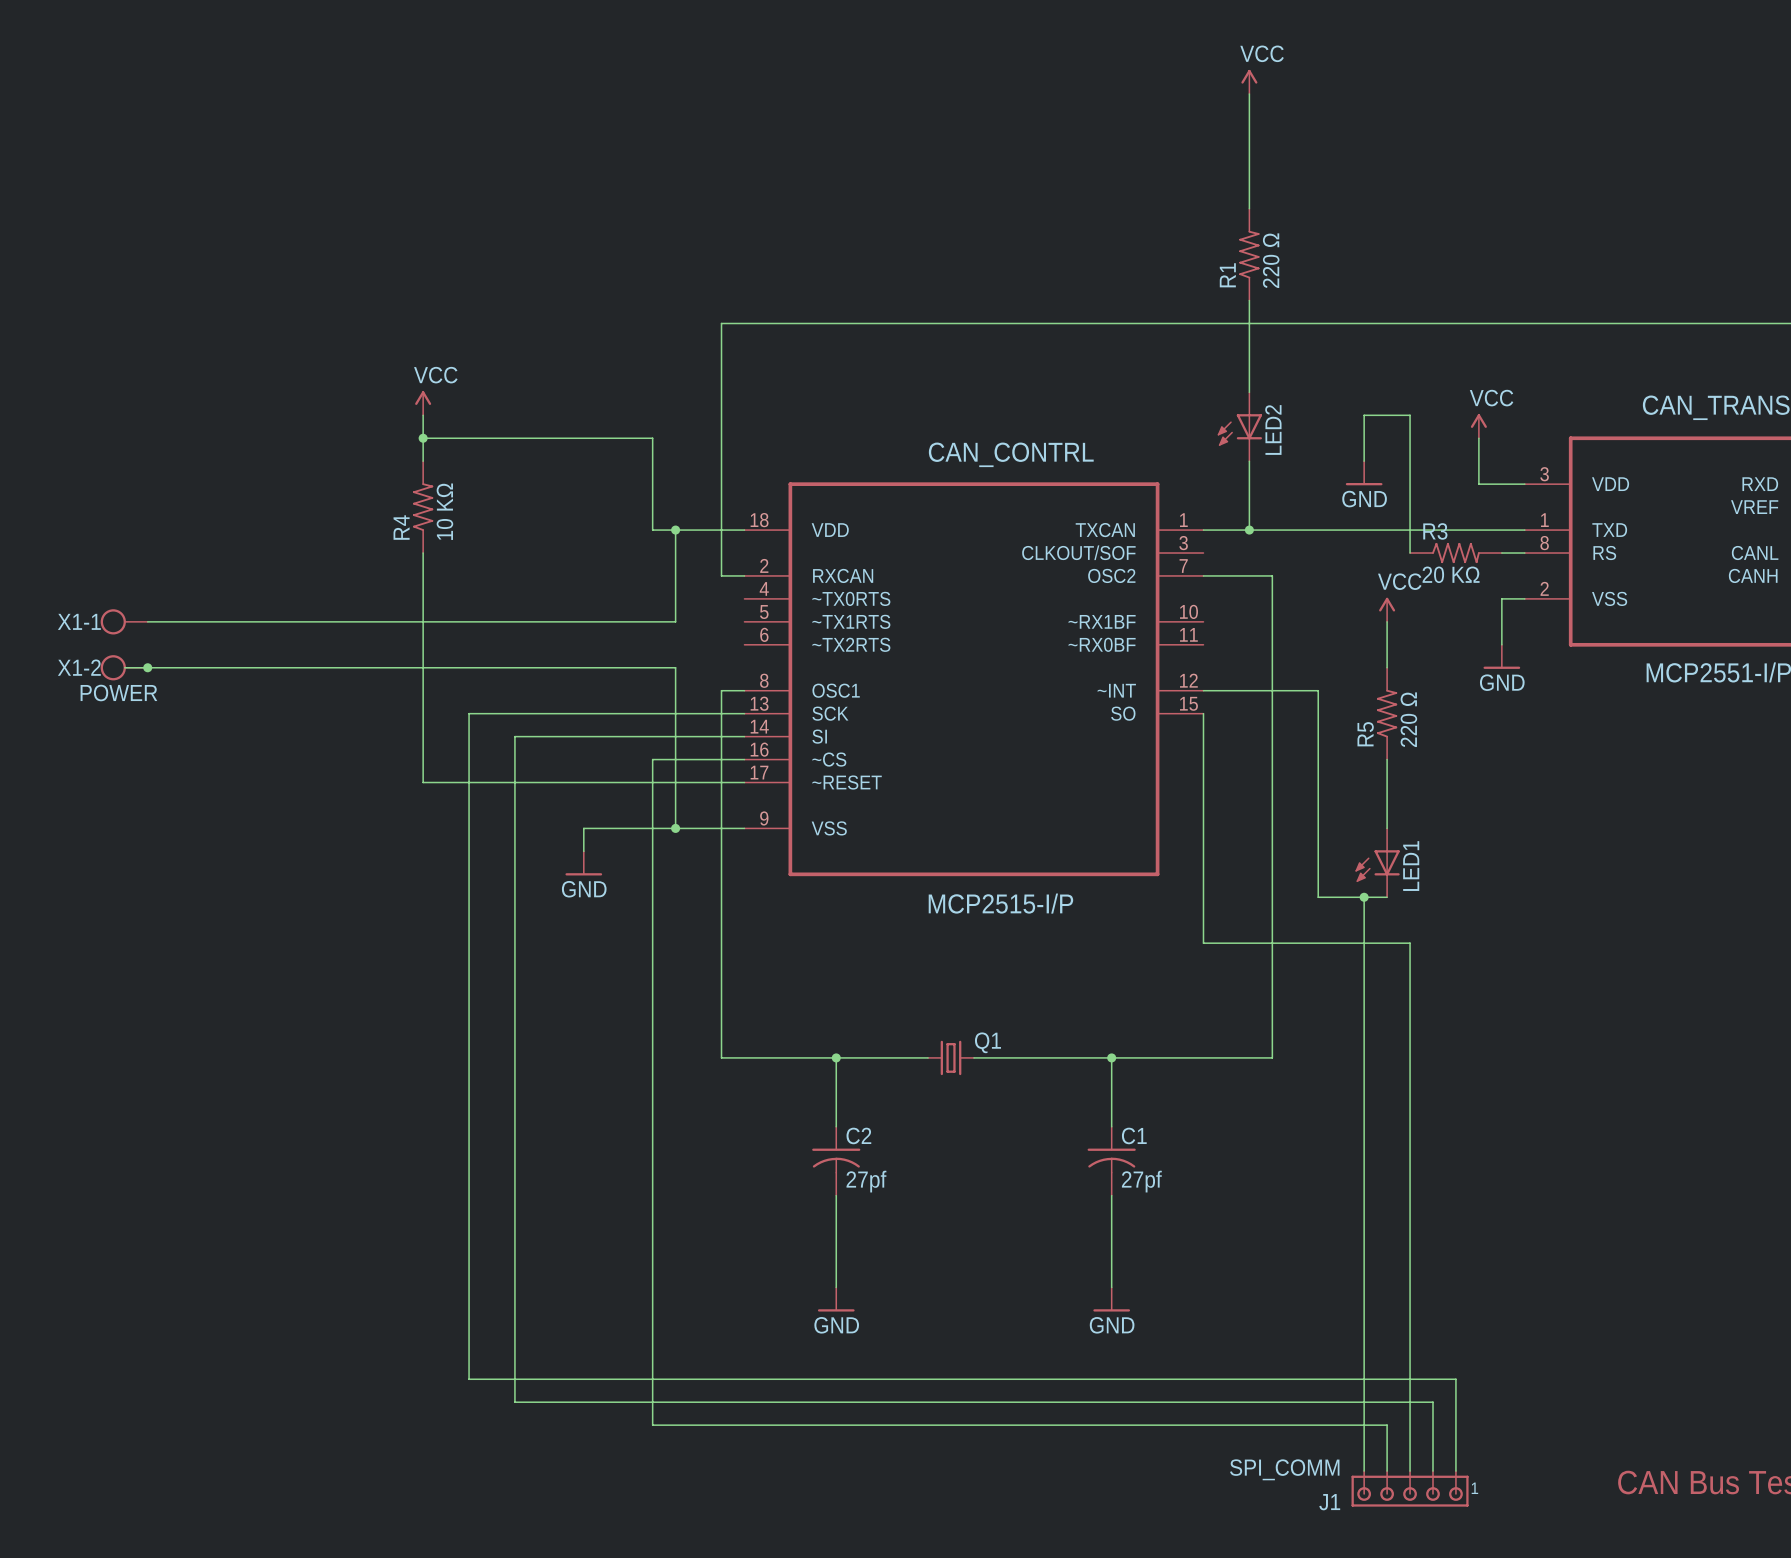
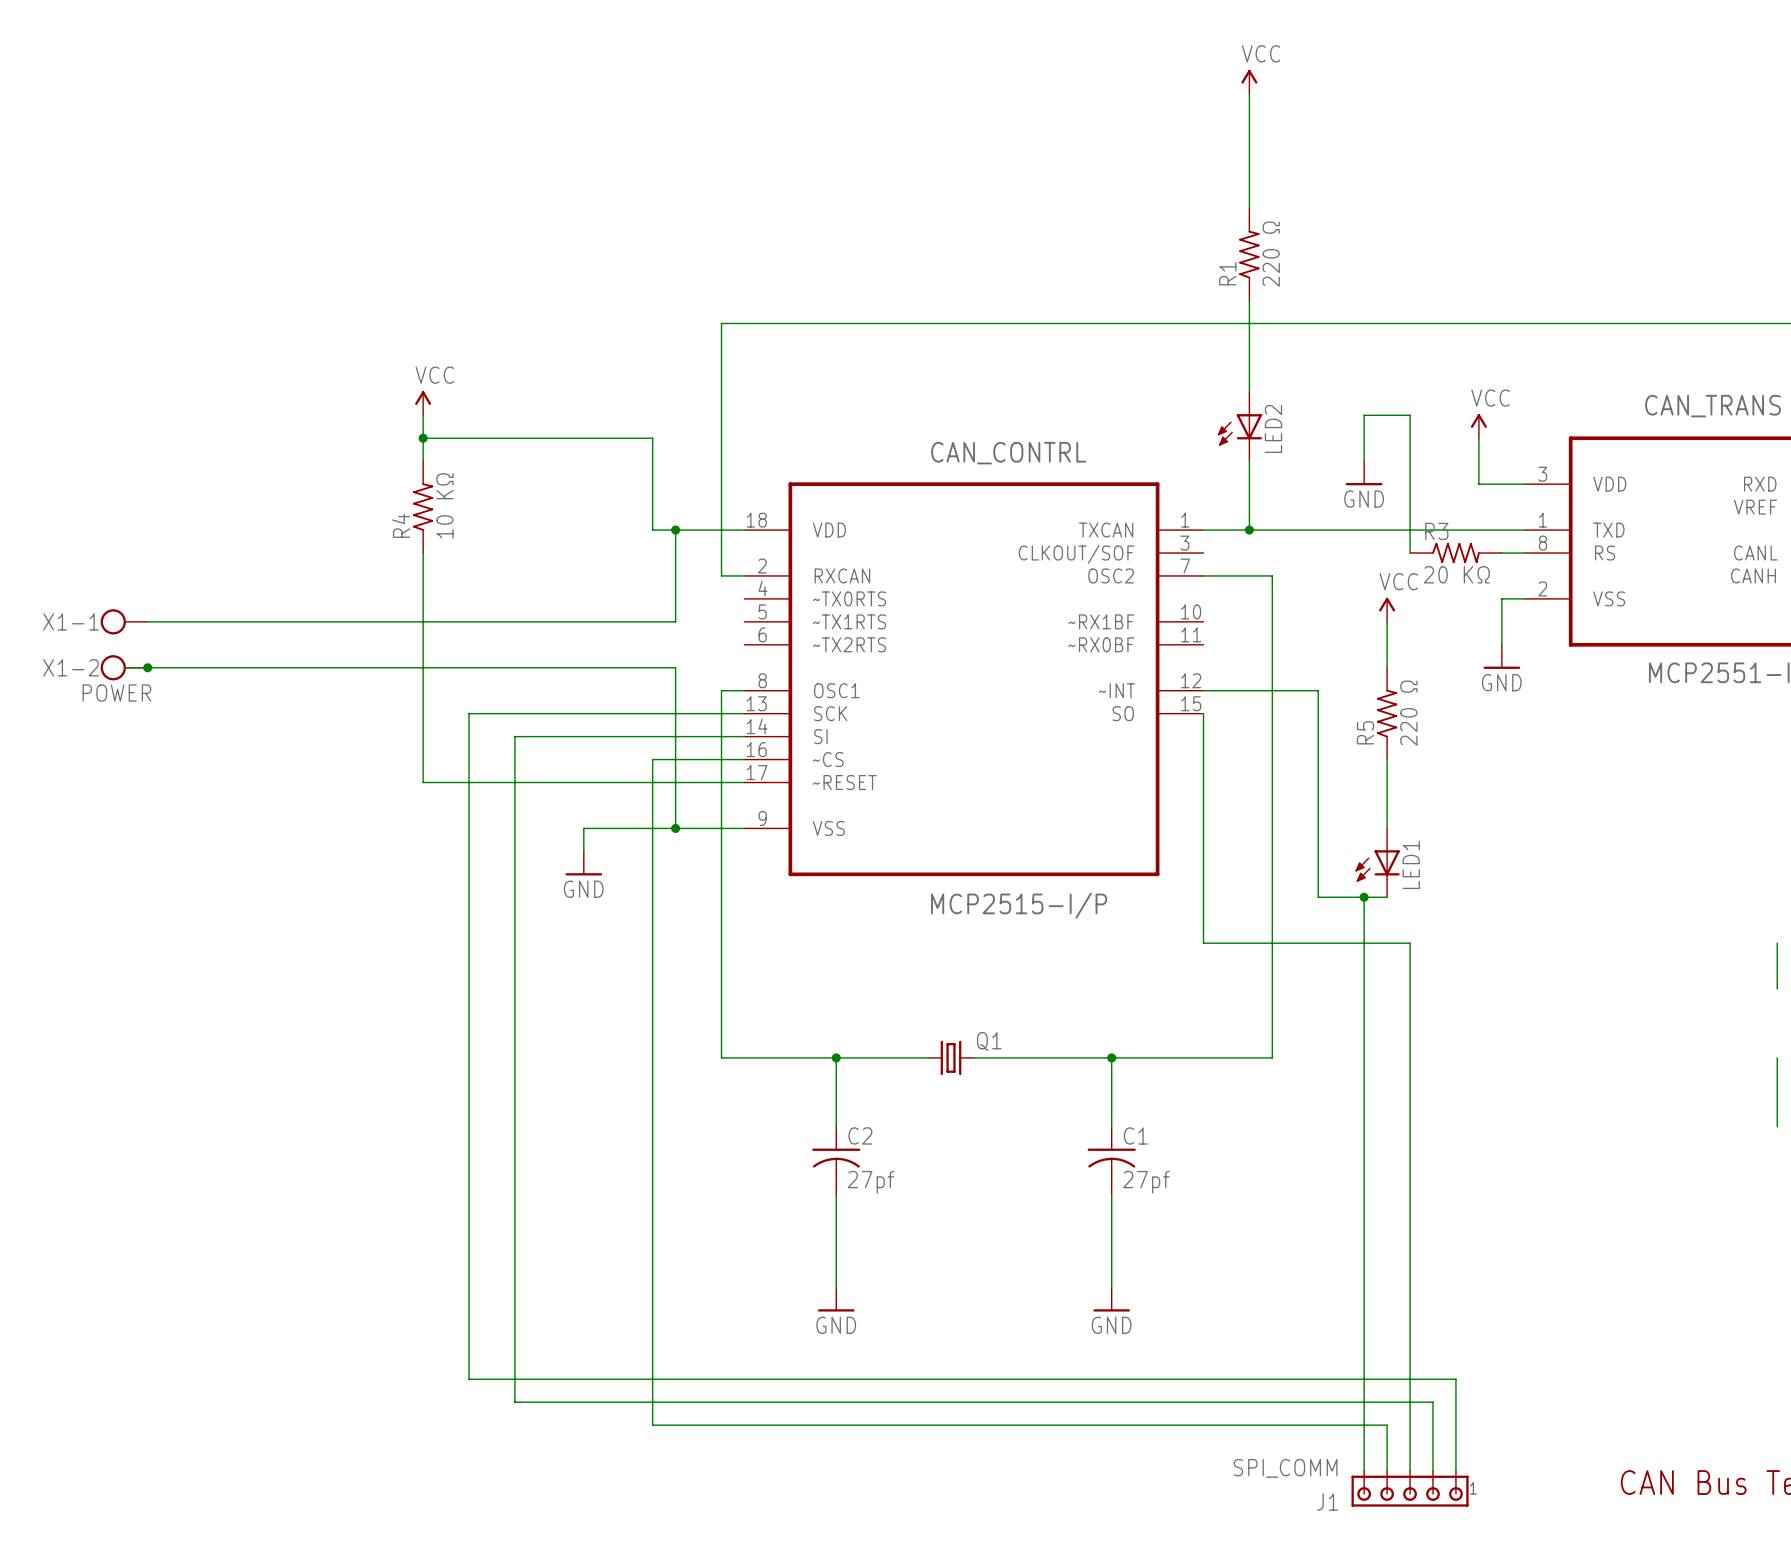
wire: none -> (1777, 943) (1777, 989)
wire: none -> (1777, 1057) (1777, 1126)

